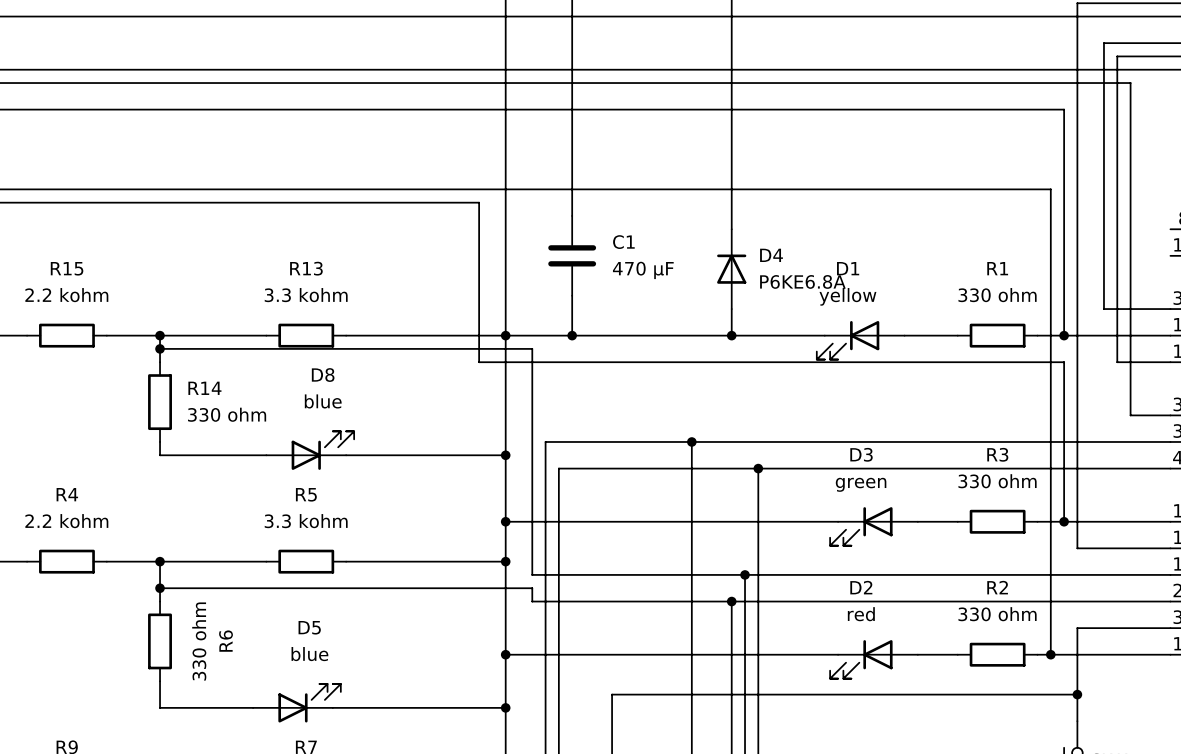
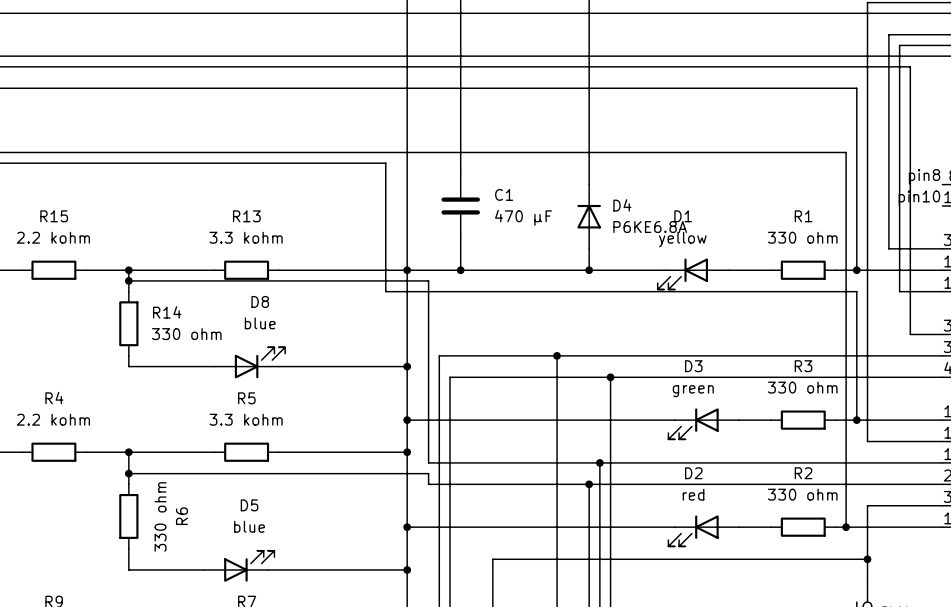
label: none -> pin8 (924, 176)
label: none -> pin10 (919, 198)

